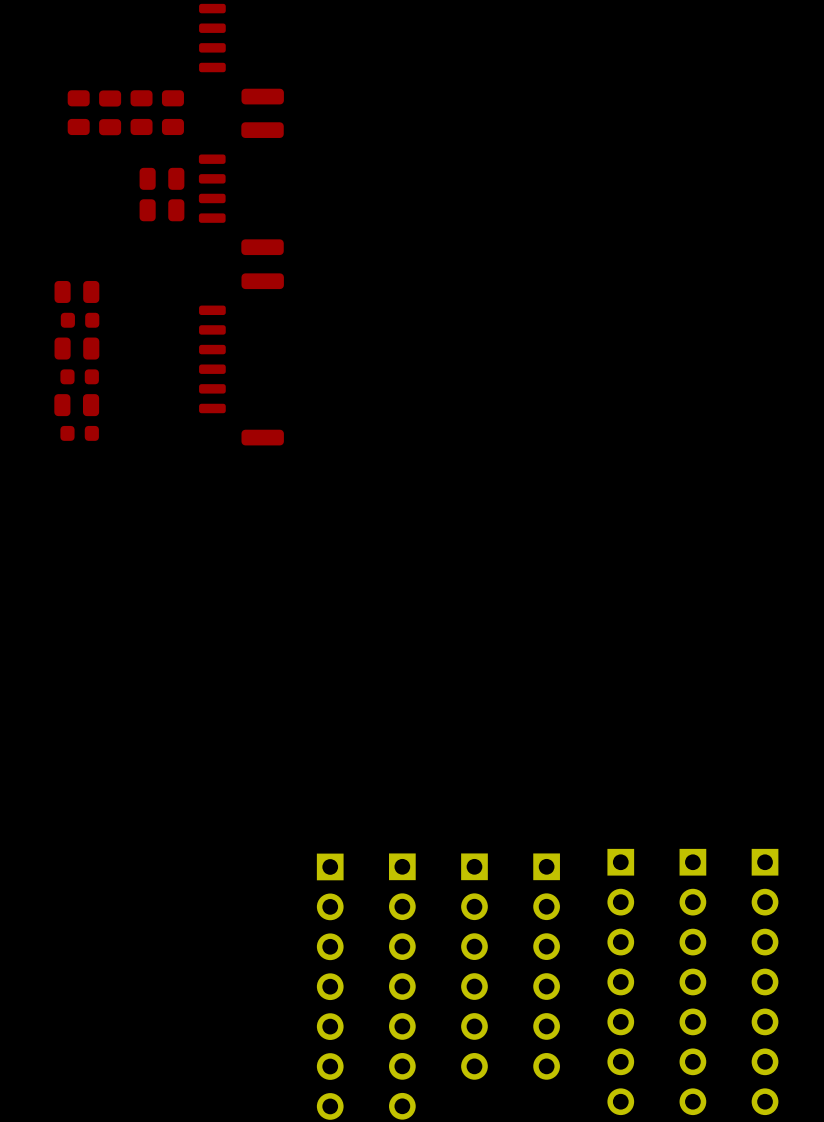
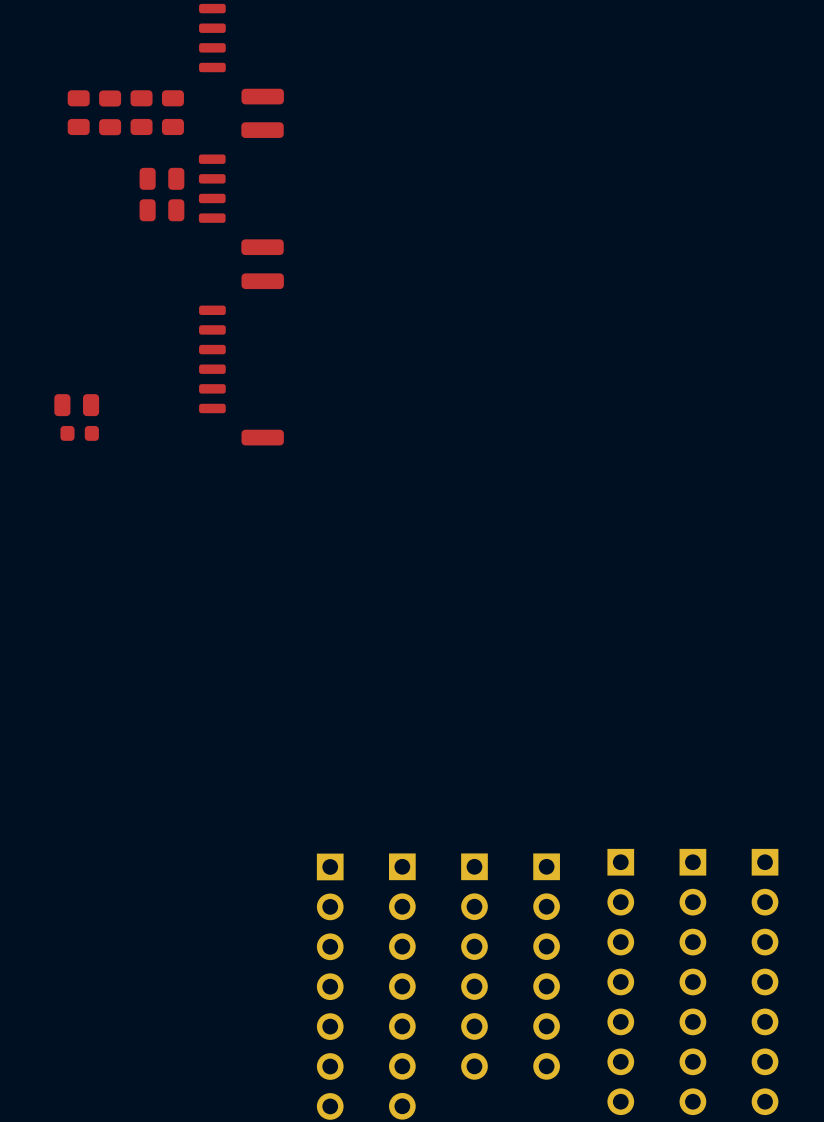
part: (76, 291) -> none
part: (80, 320) -> none
part: (76, 348) -> none
part: (79, 376) -> none

